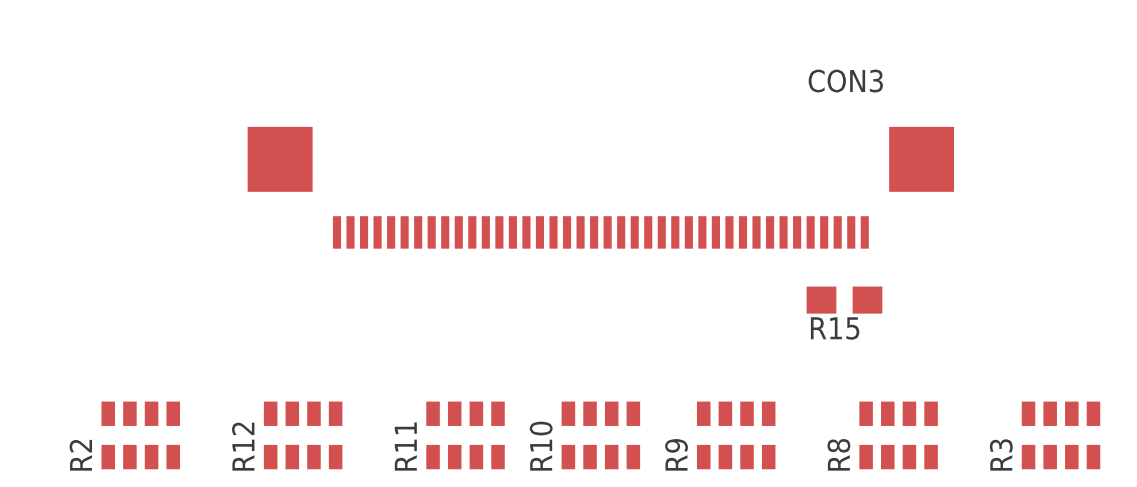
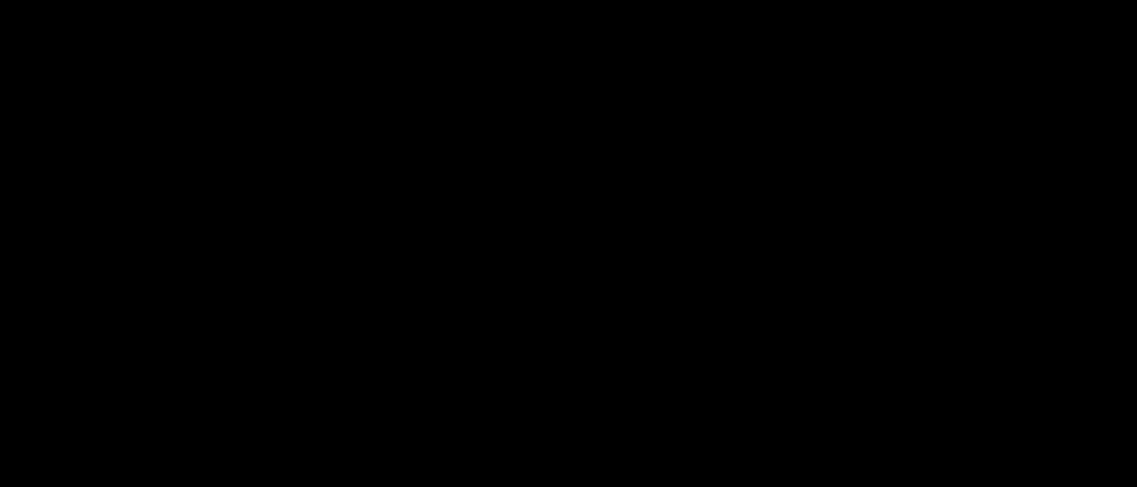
CON3: (600, 187) -> none
R15: (844, 300) -> none
R2: (140, 435) -> none
R12: (303, 435) -> none
R11: (465, 435) -> none
R10: (600, 435) -> none
R9: (736, 435) -> none
R8: (898, 435) -> none
R3: (1061, 435) -> none

